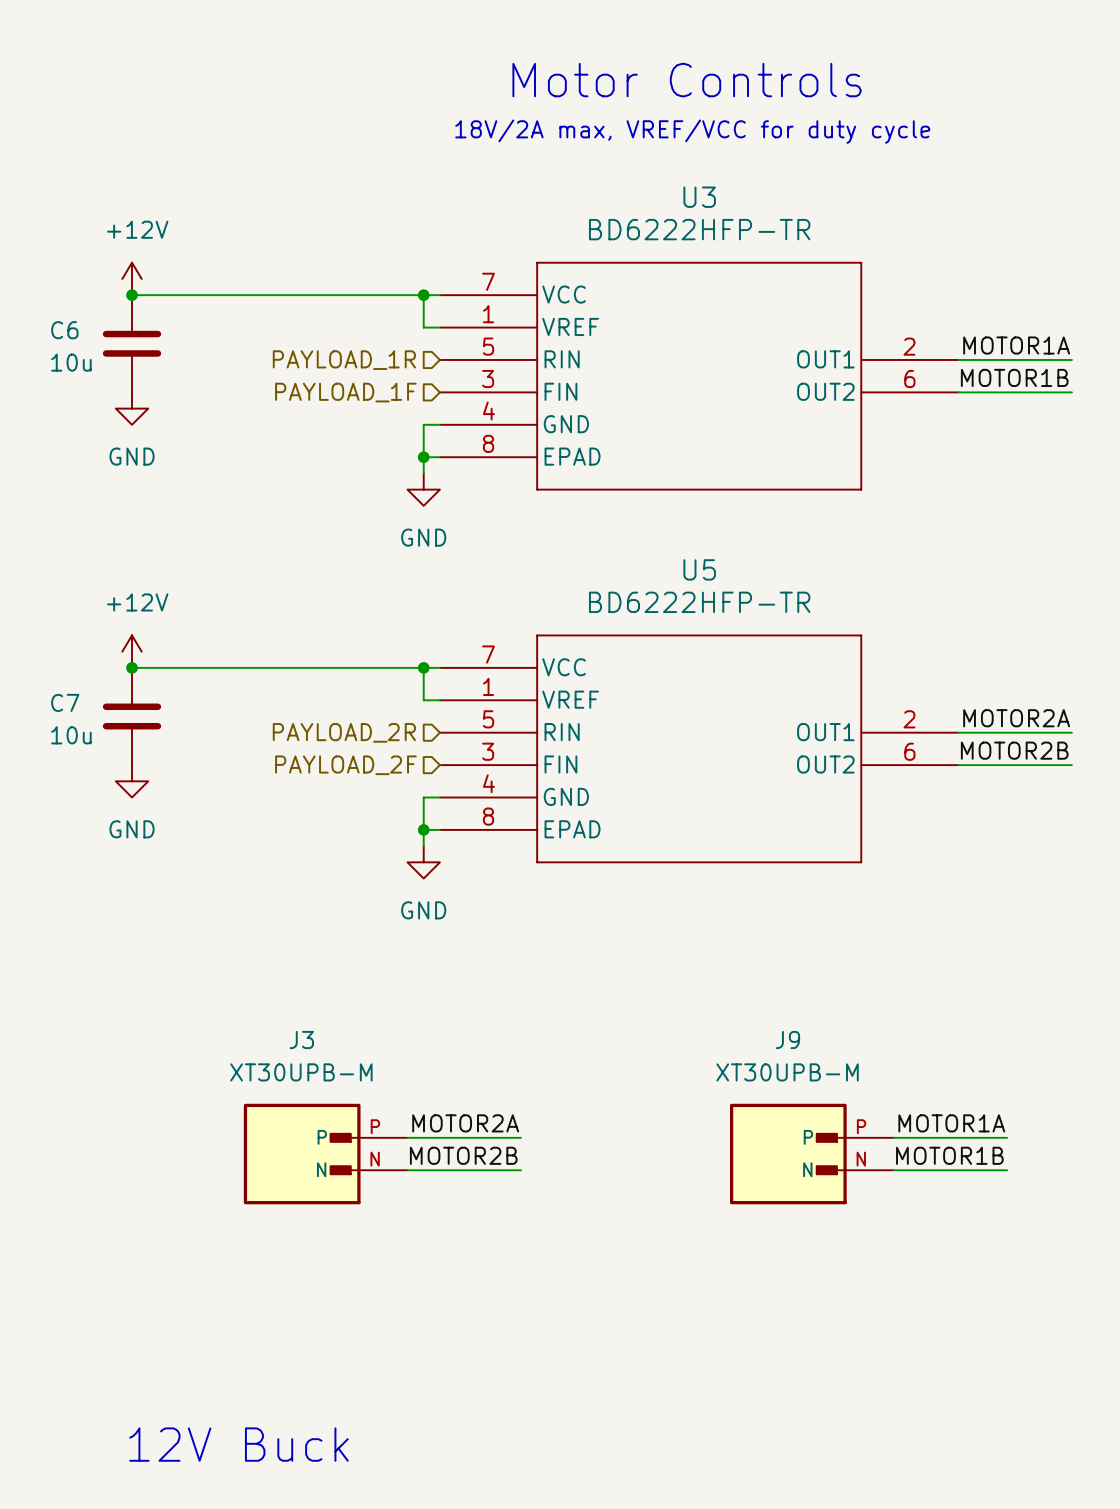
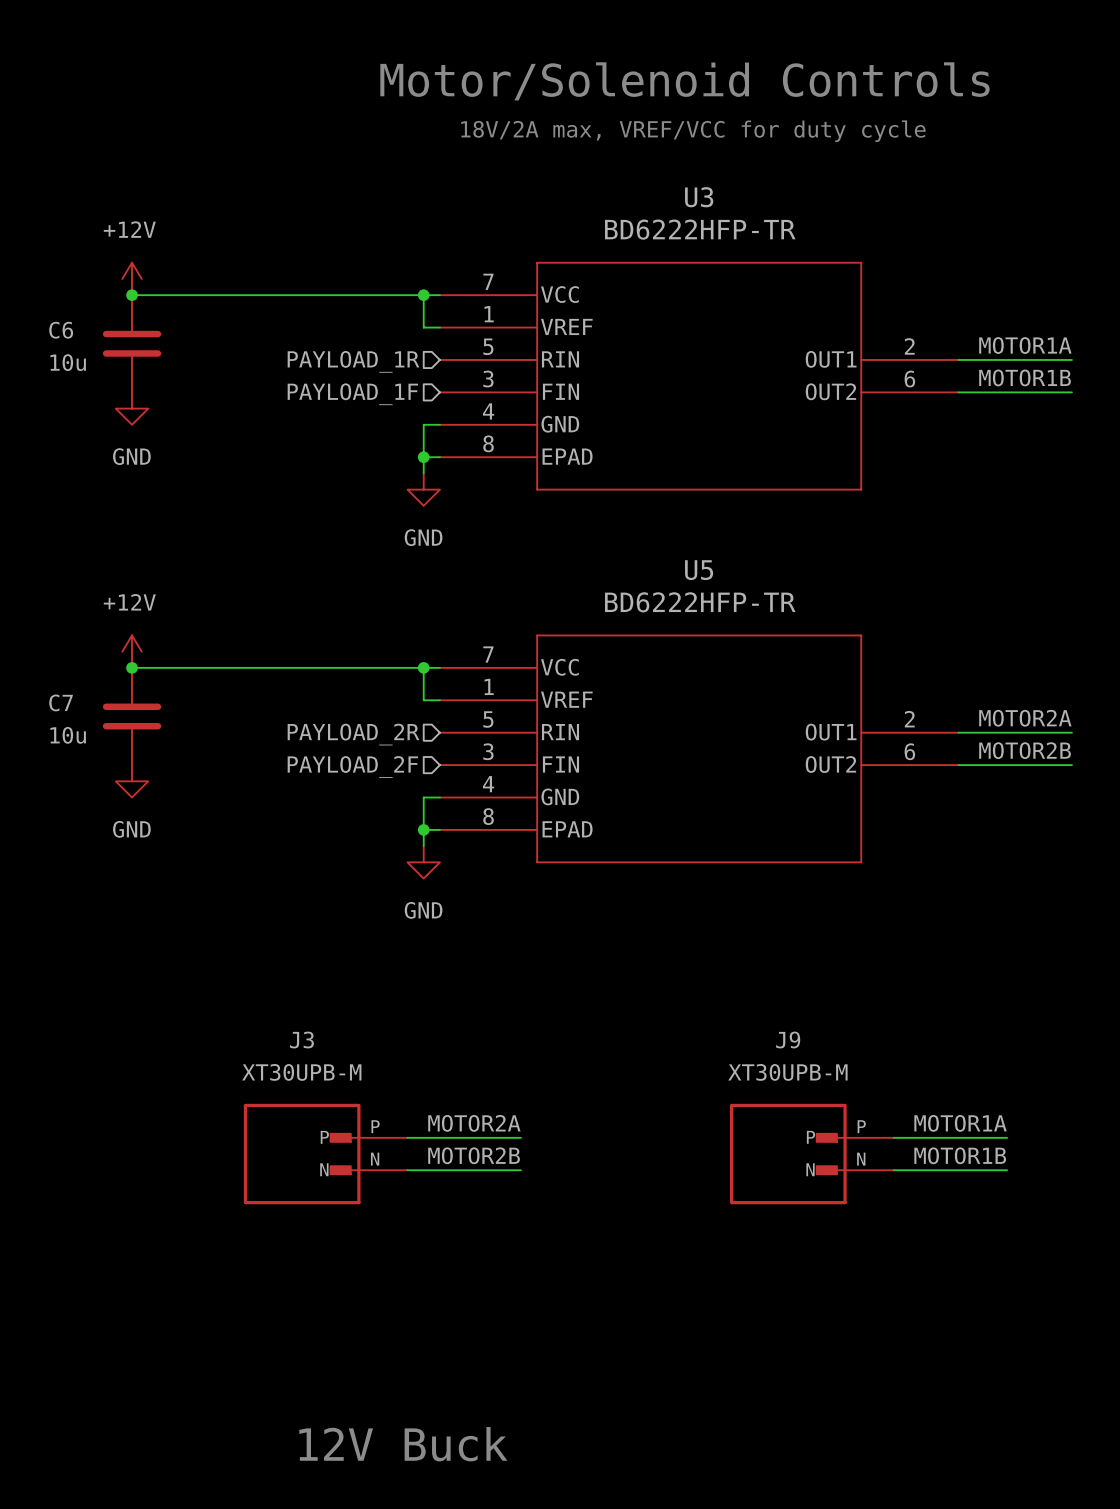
text: Motor Controls (687, 80) -> Motor/Solenoid Controls (684, 81)
text position: 12V Buck (238, 1444) -> 12V Buck (403, 1444)

